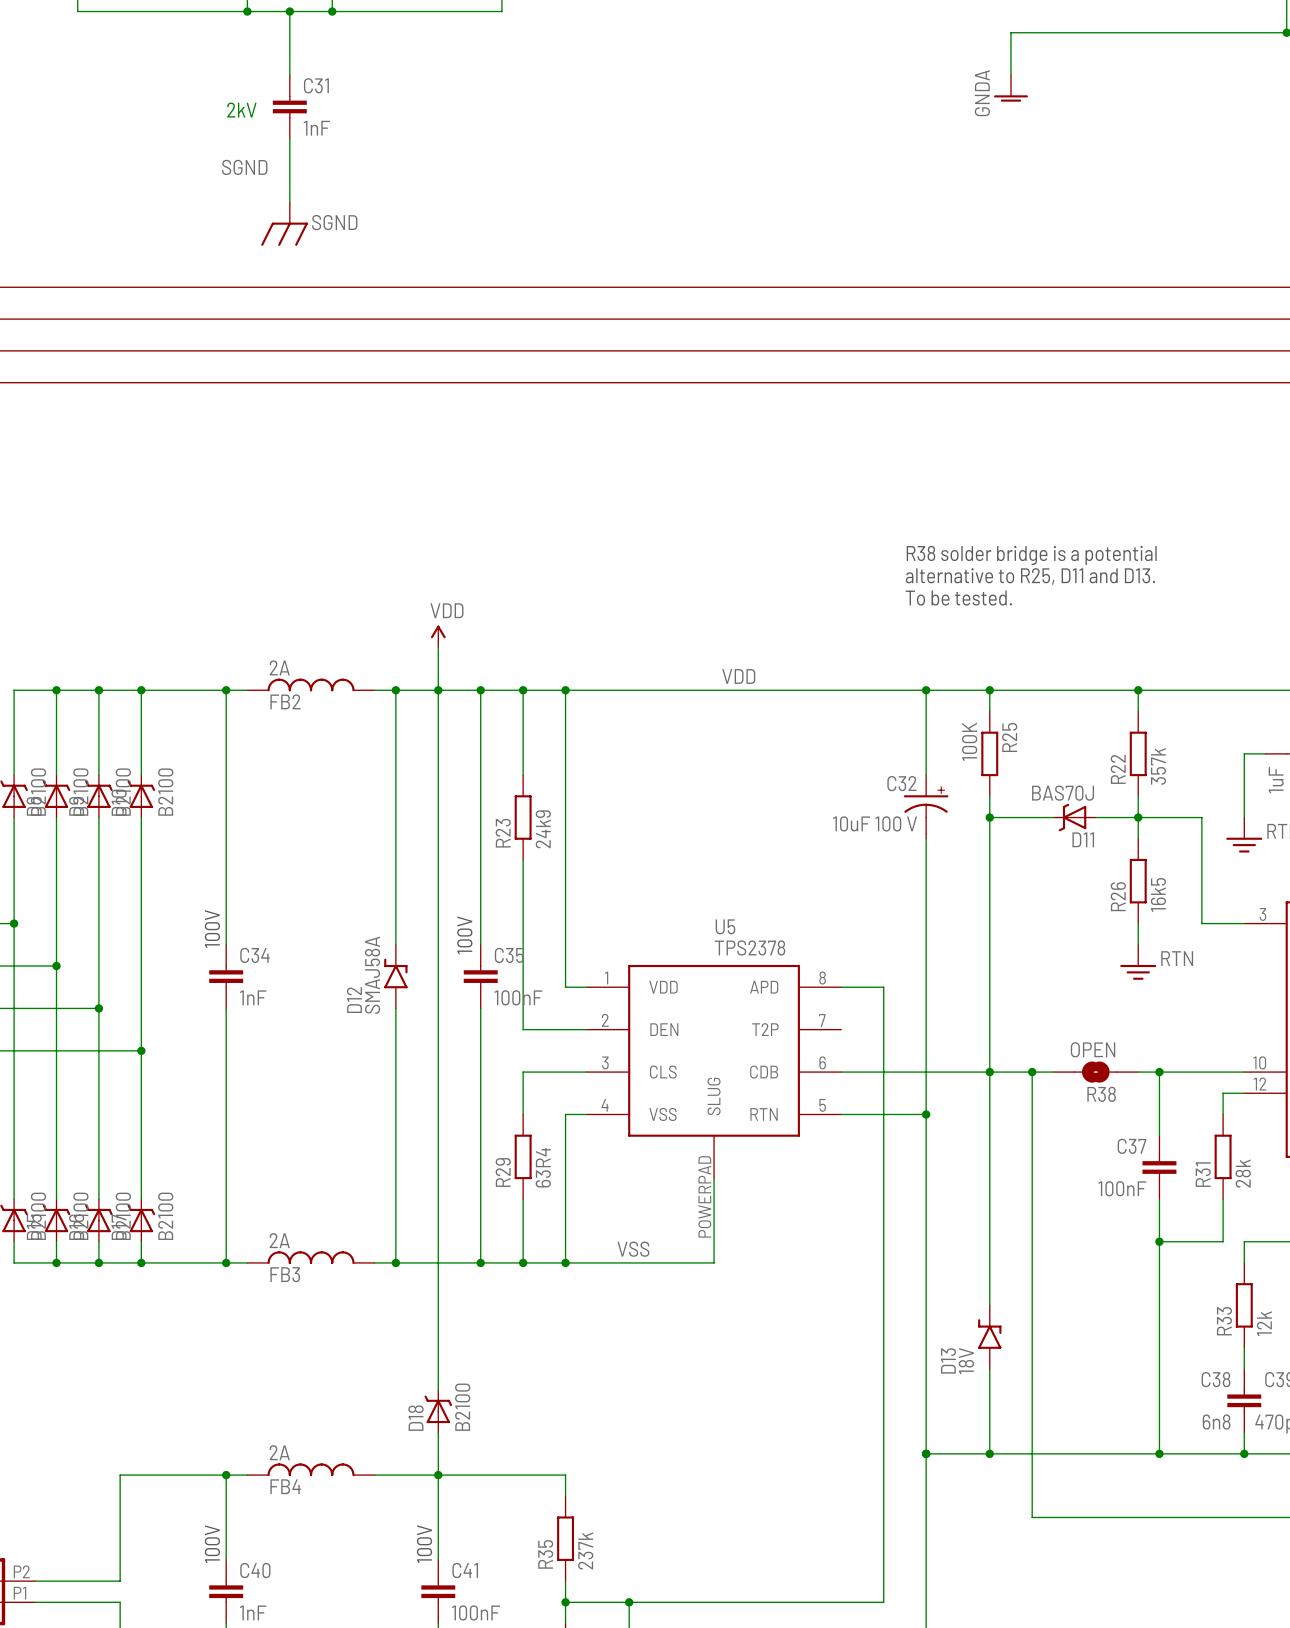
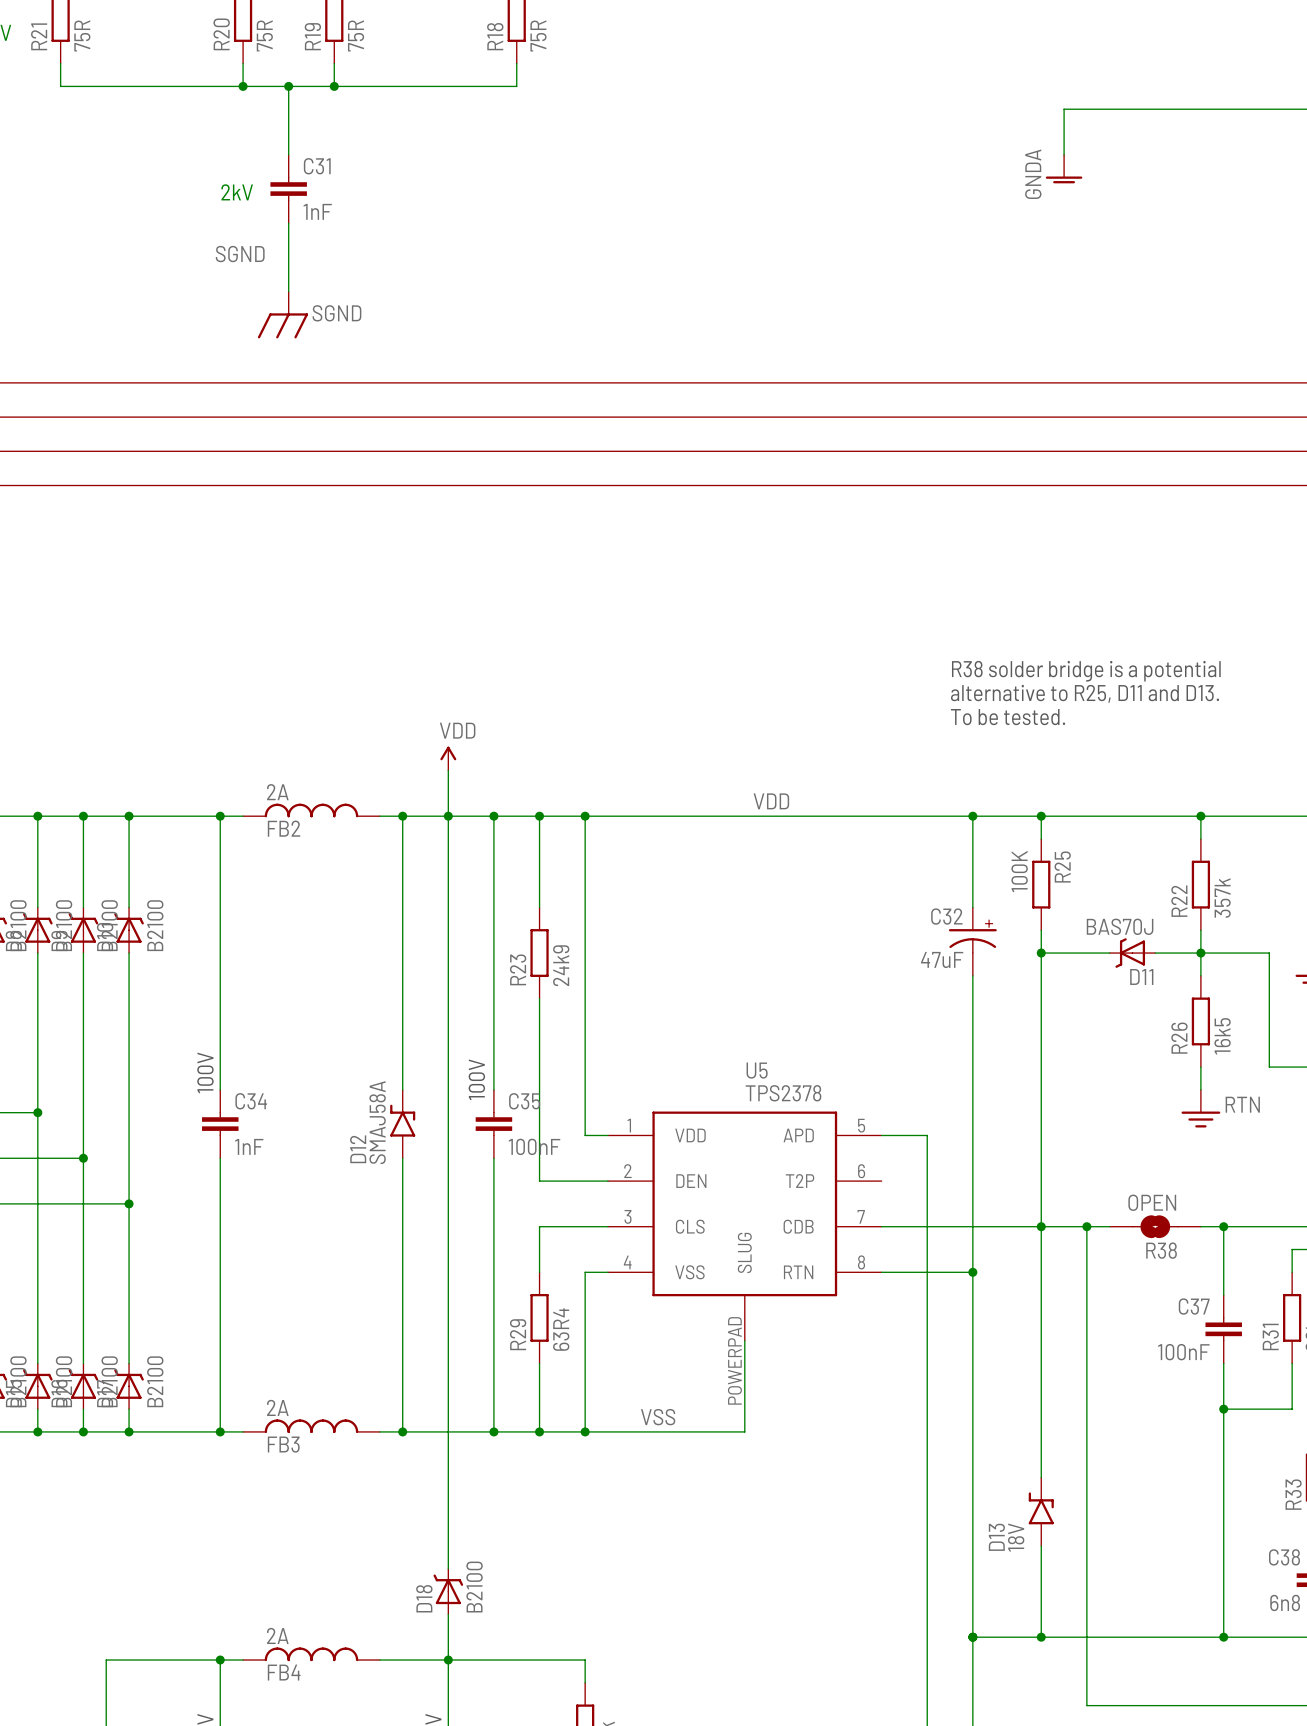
C32 value: 10uF 100 V (875, 823) -> 47uF (942, 959)
U5 pin number: 8 (822, 978) -> 5 (861, 1125)
U5 pin number: 7 (822, 1020) -> 6 (861, 1171)
U5 pin number: 6 (822, 1062) -> 7 (861, 1216)
U5 pin number: 5 (822, 1105) -> 8 (861, 1262)

